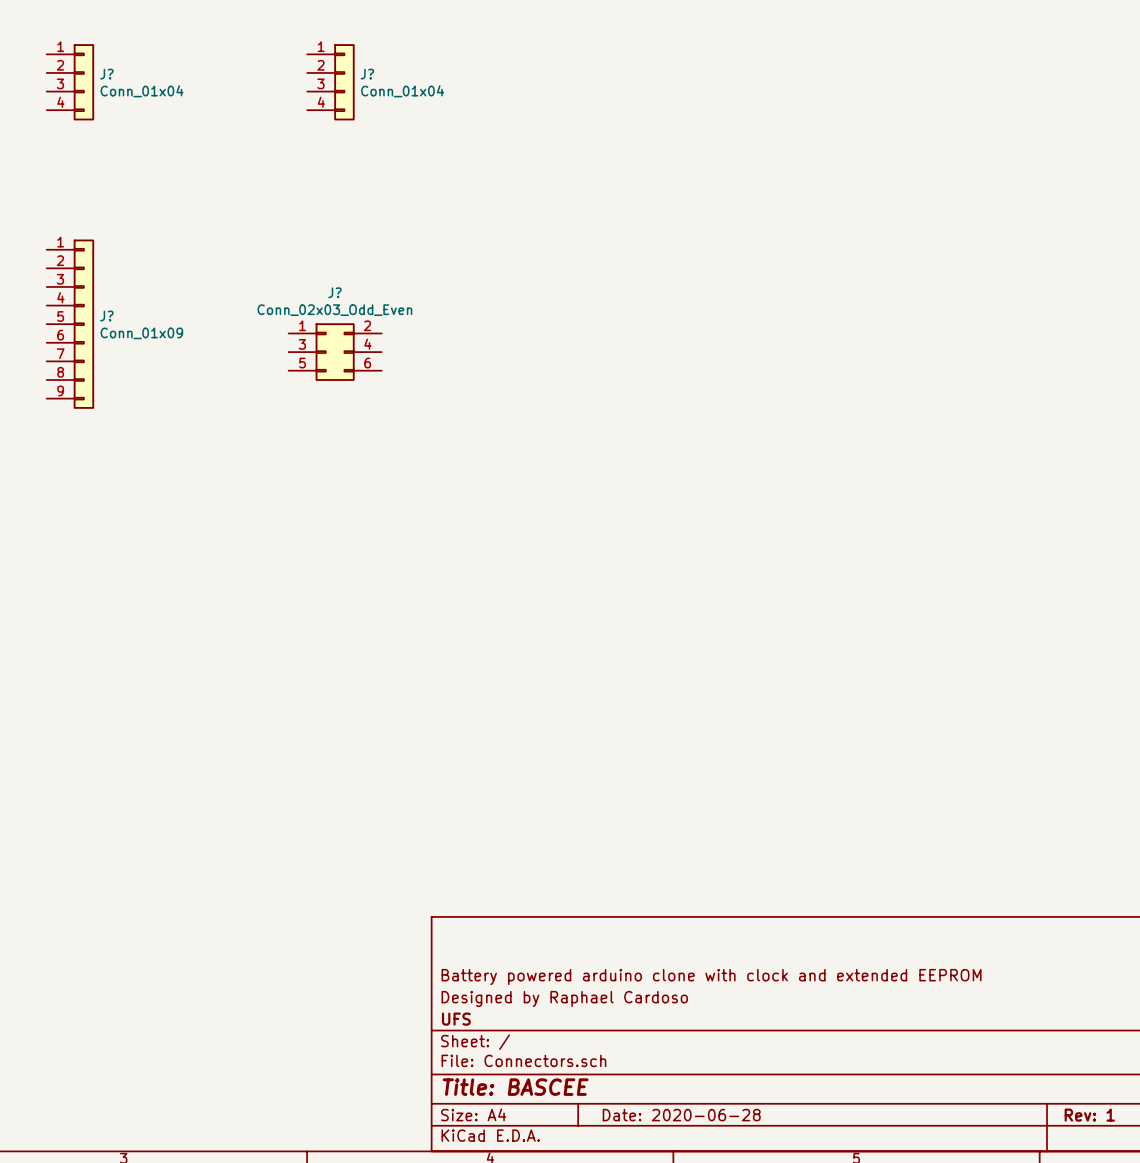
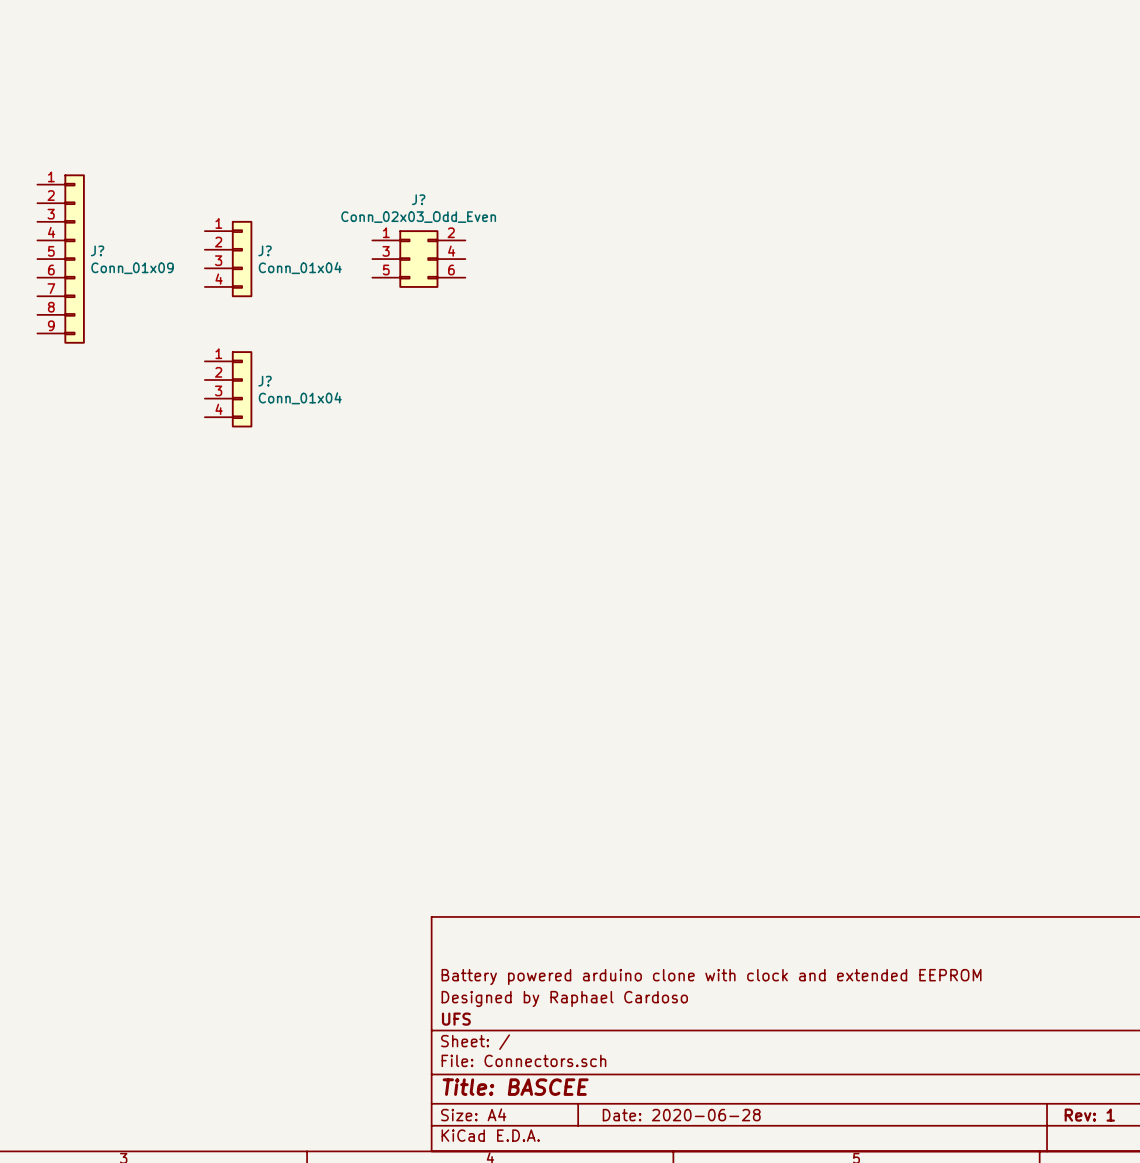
J?: Conn_01x04 (70, 82) -> none
J?: Conn_01x04 (330, 82) -> none
J?: none -> Conn_01x04 (228, 259)
J? position: (70, 324) -> (61, 259)
J? position: (335, 352) -> (418, 259)
J?: none -> Conn_01x04 (228, 389)

